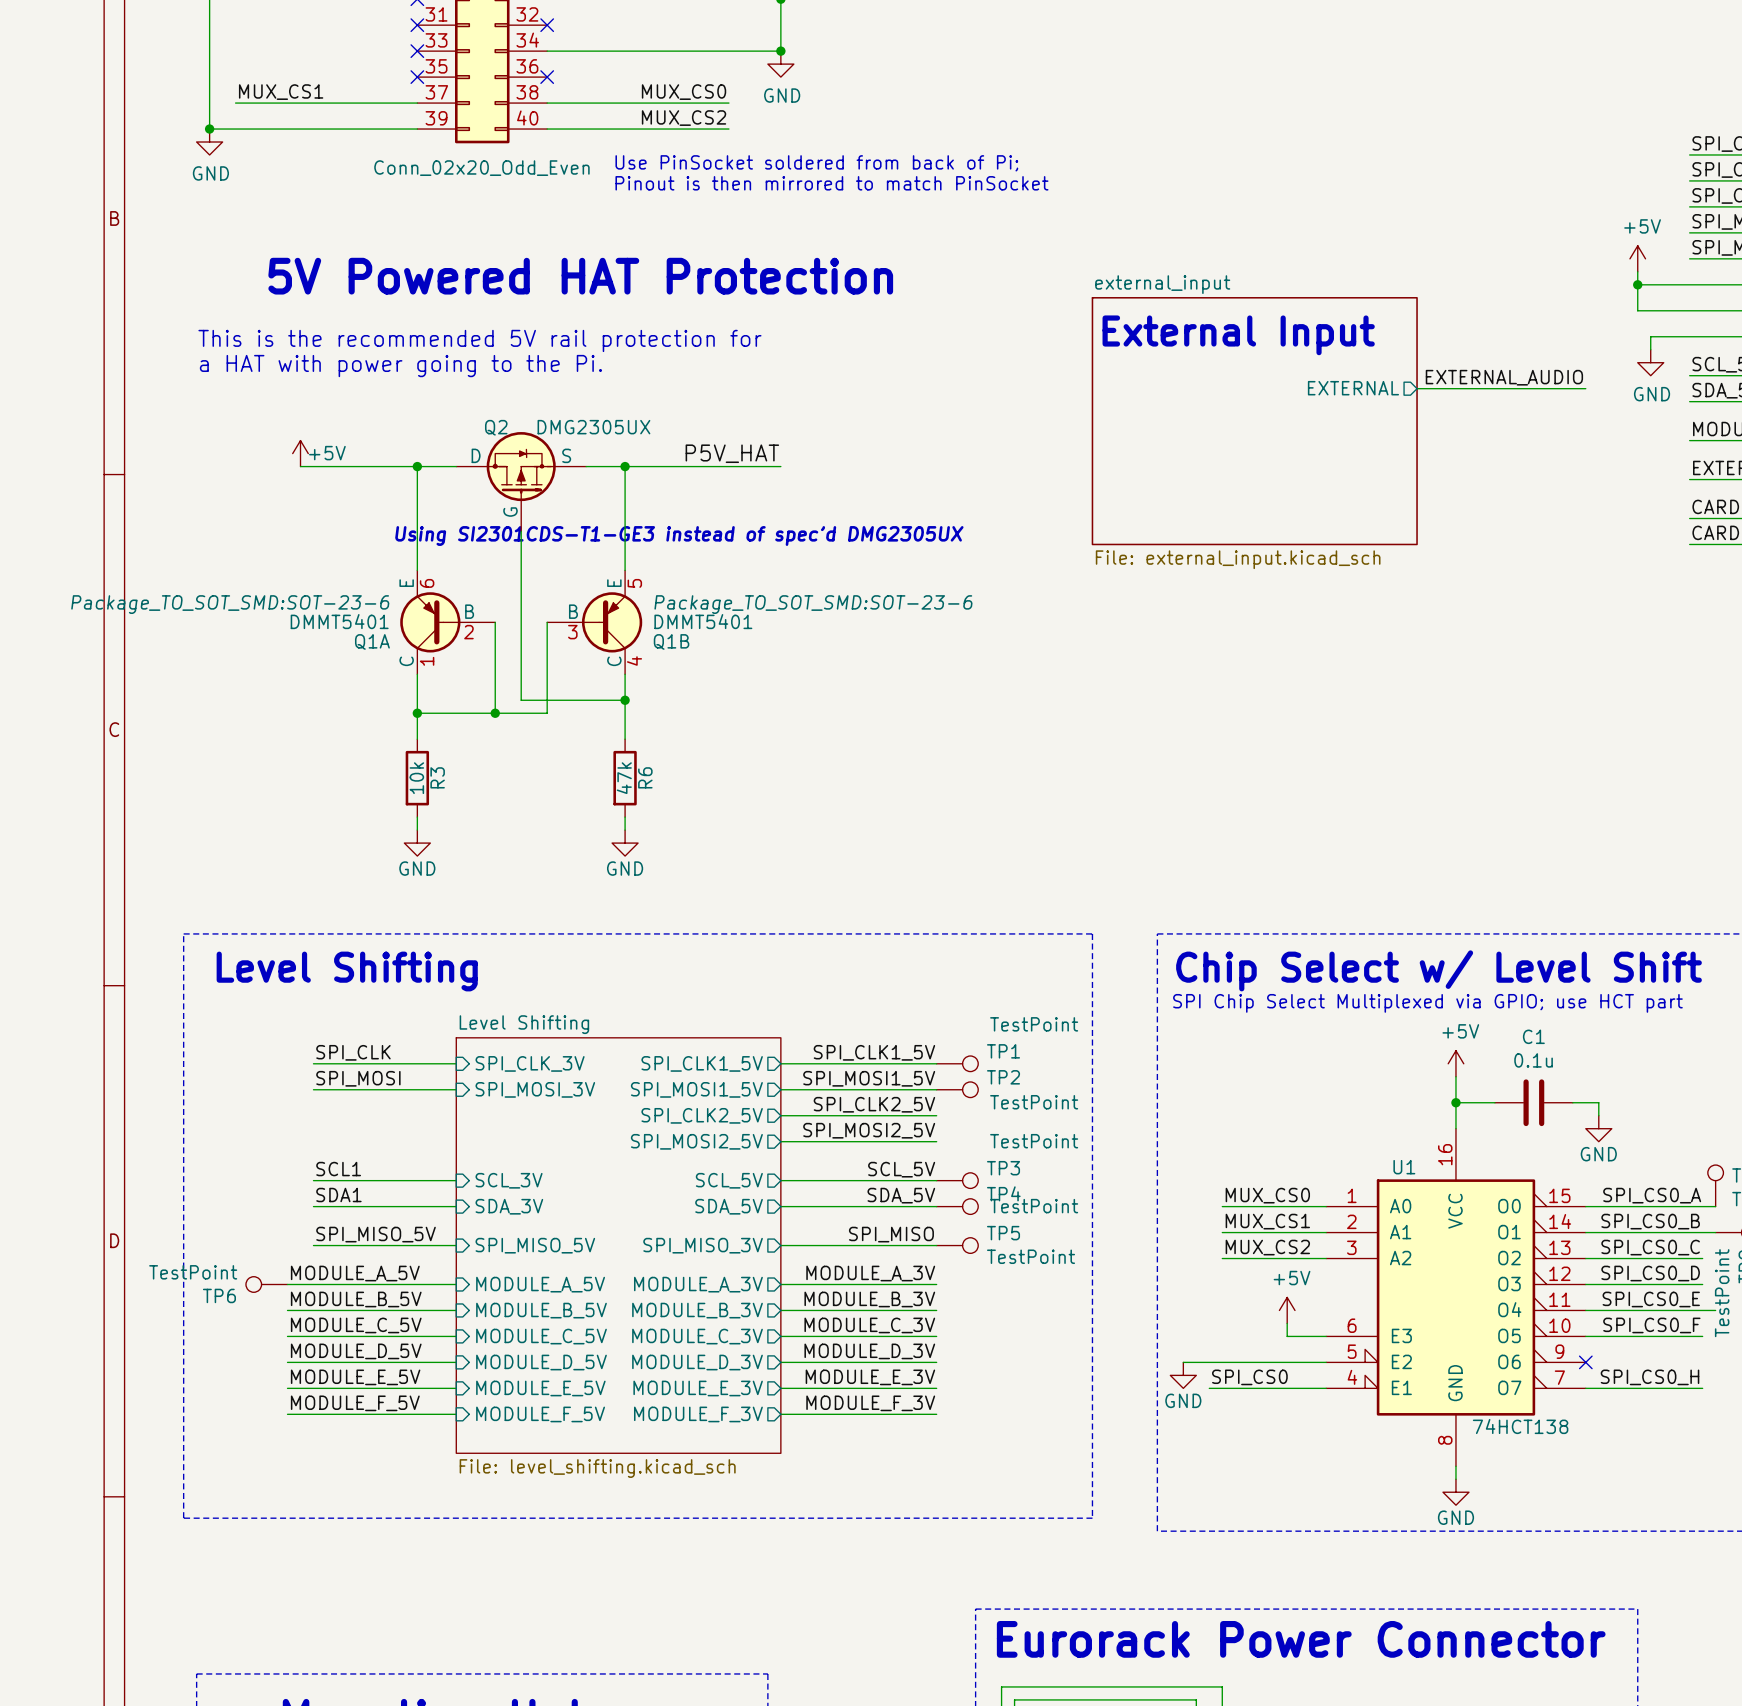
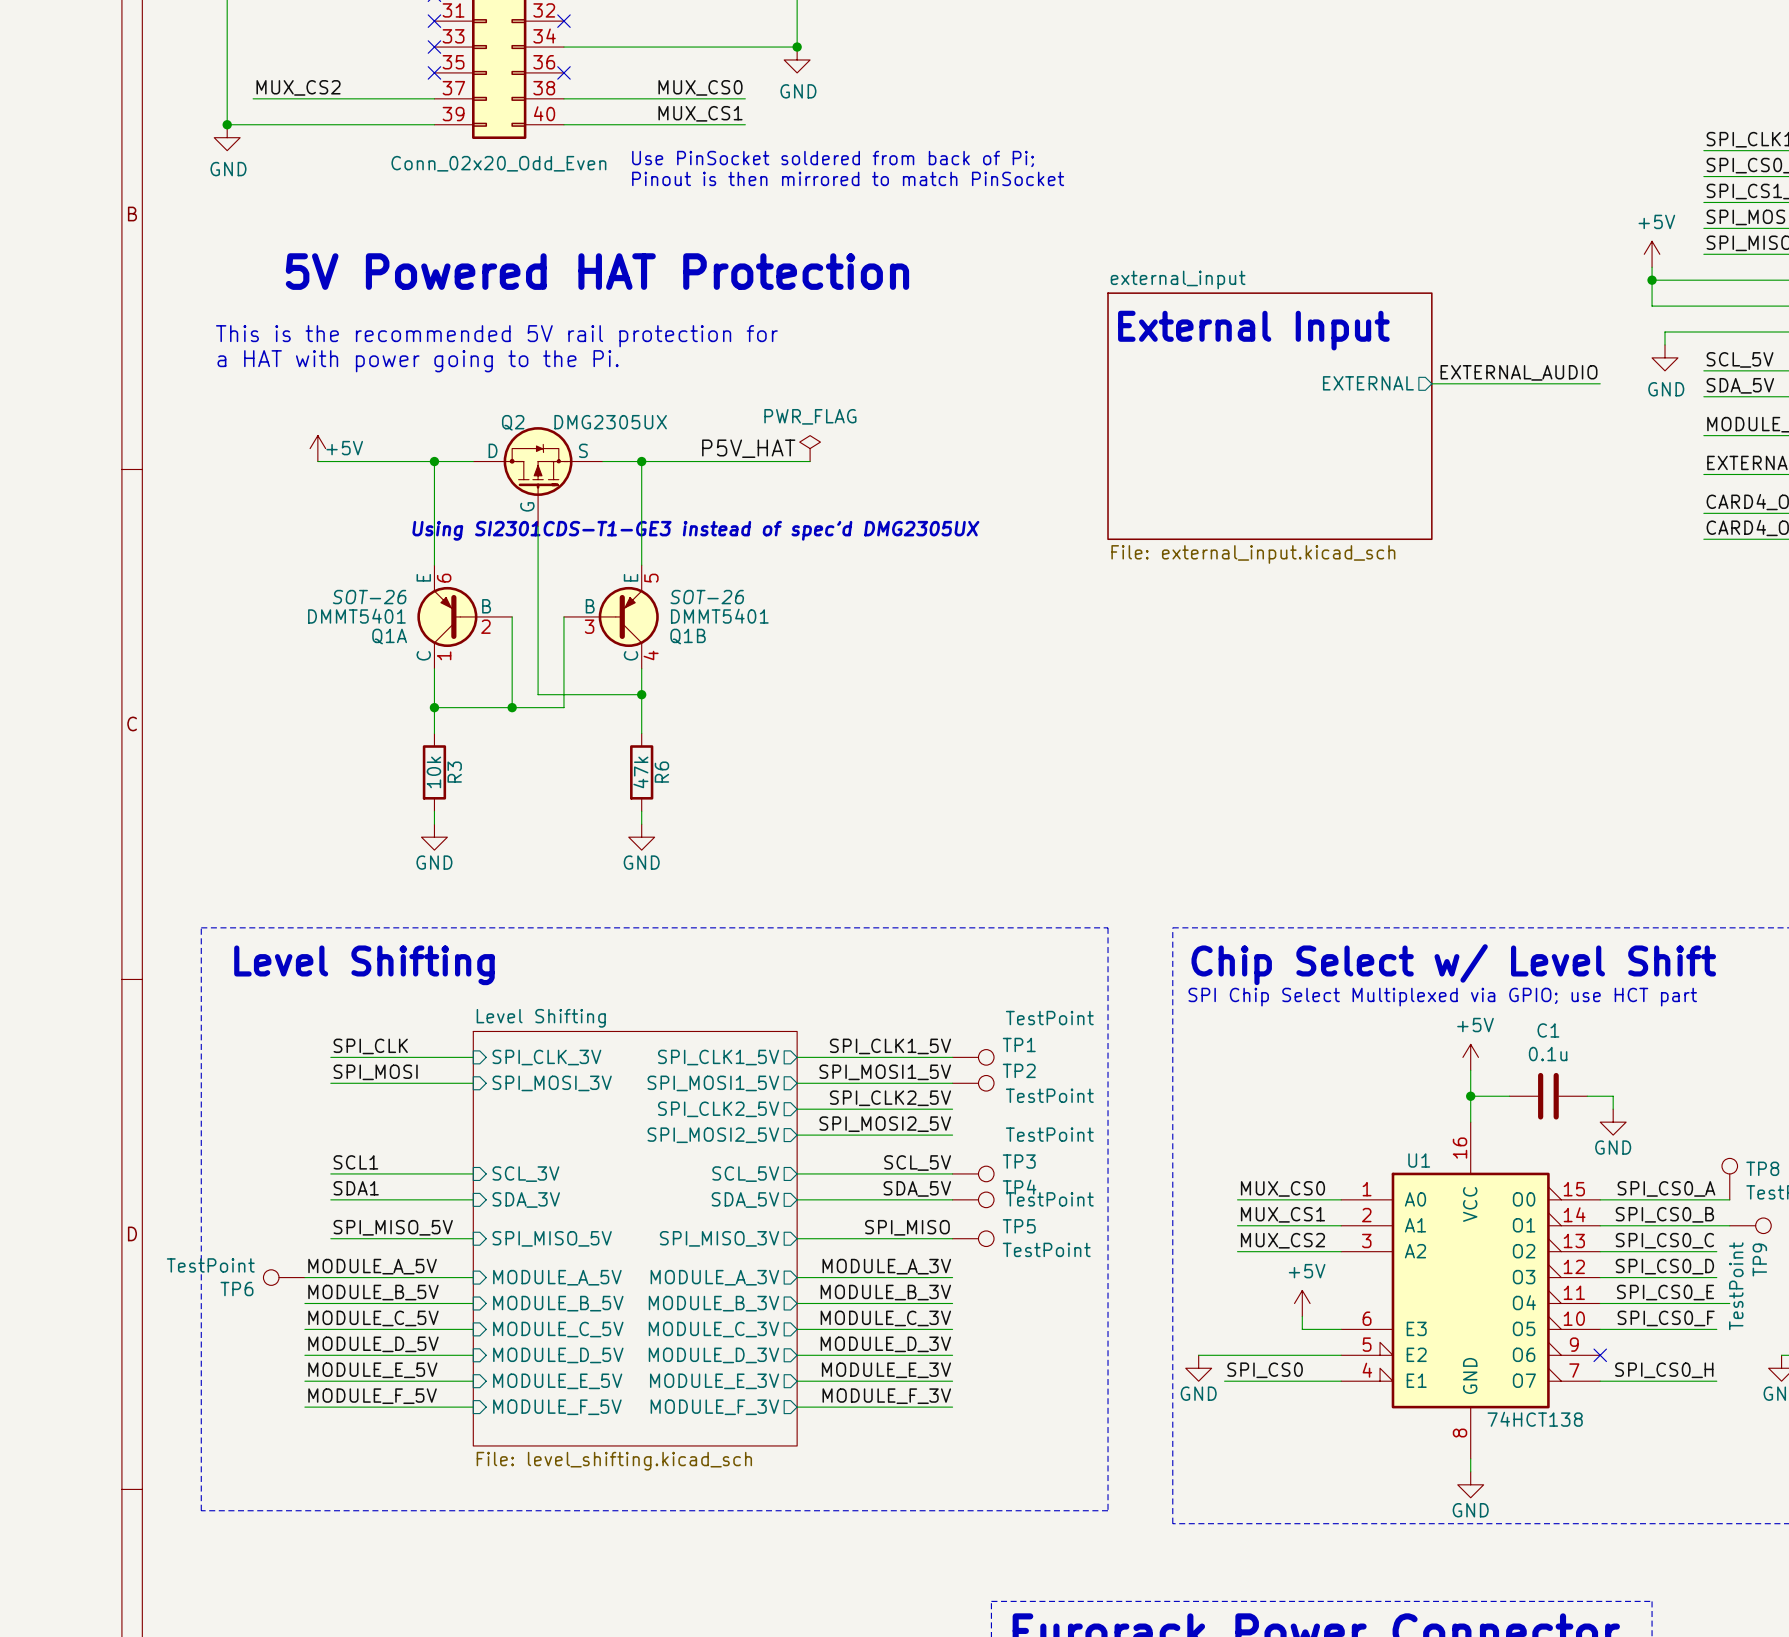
label: MUX_CS1 (281, 92) -> MUX_CS2 (298, 87)
label: MUX_CS2 (684, 118) -> MUX_CS1 (700, 113)
power symbol: none -> PWR_FLAG (810, 448)
wire: none -> (797, 461) (810, 461)
Q1A text: Package_TO_SOT_SMD:SOT-23-6 (230, 604) -> SOT-26 (369, 597)
Q1B text: Package_TO_SOT_SMD:SOT-23-6 (813, 604) -> SOT-26 (707, 597)

